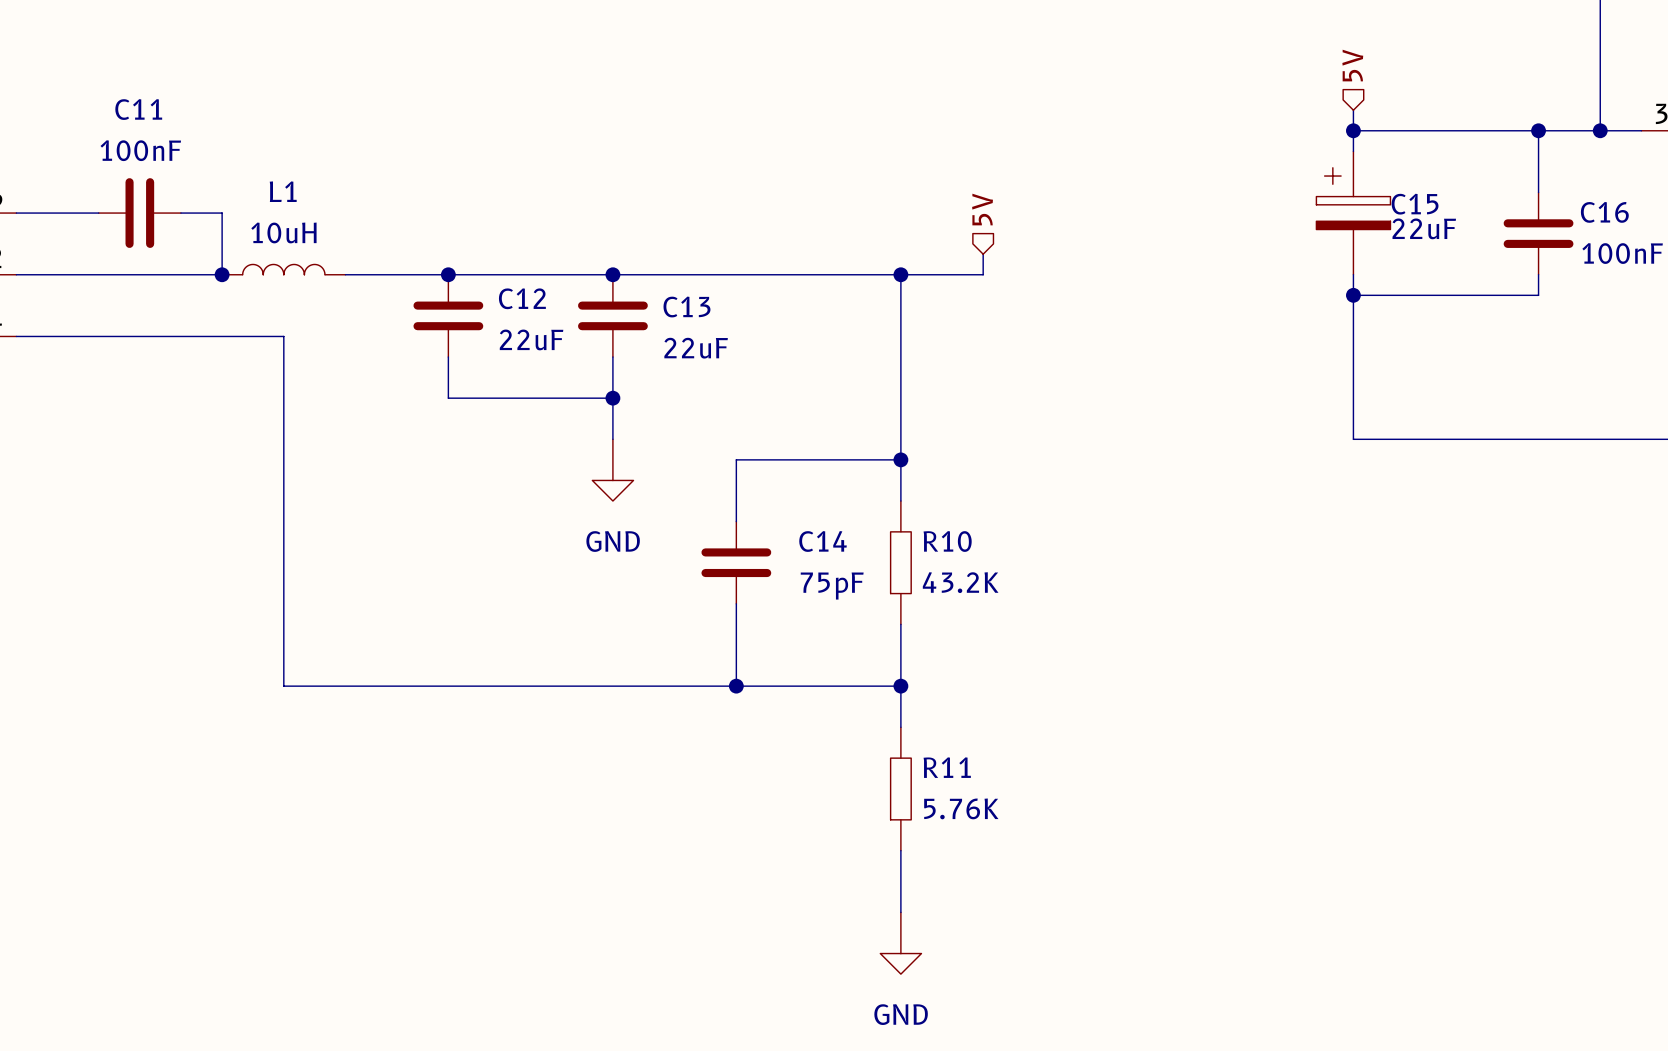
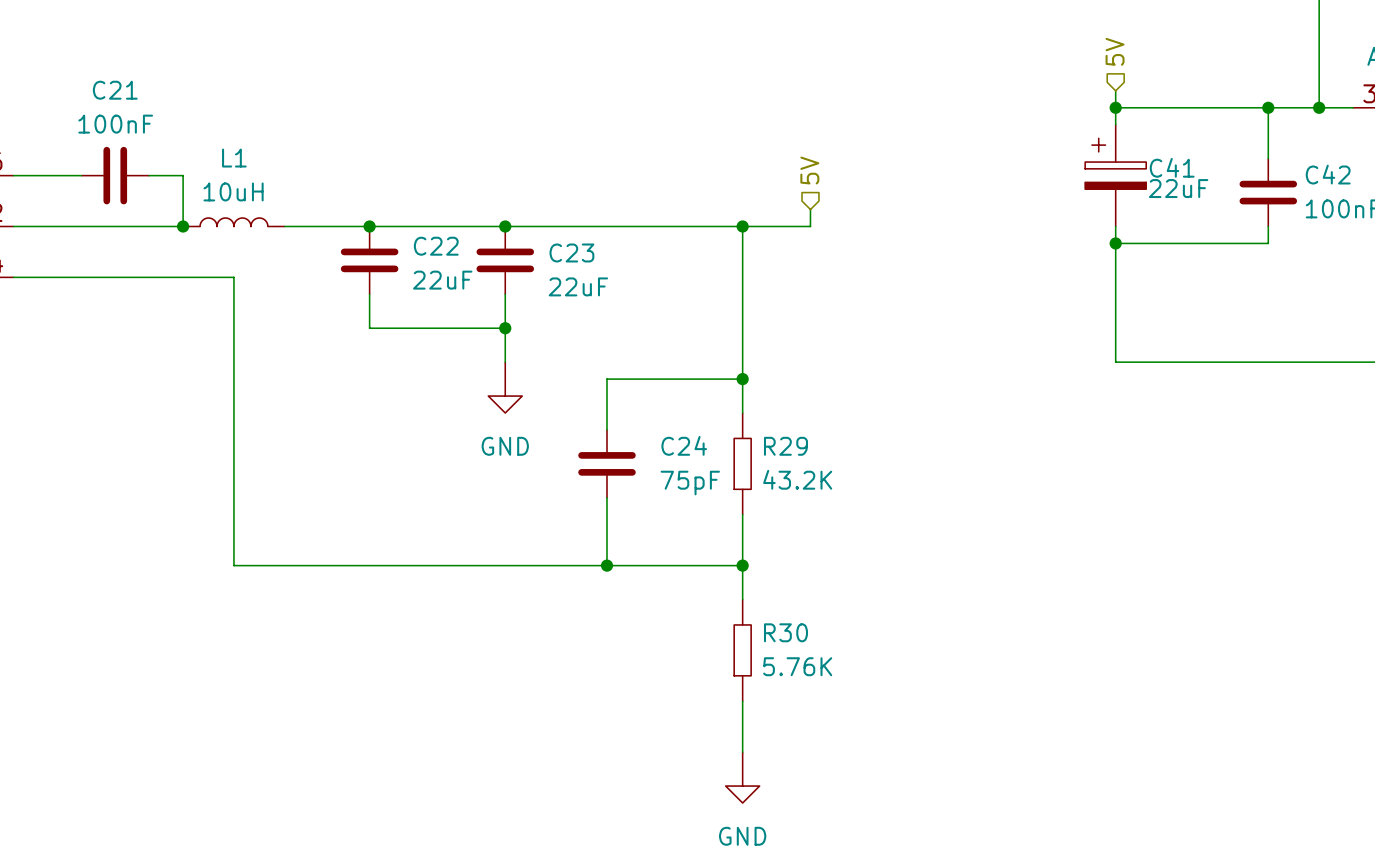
C11 name: C11 (138, 109) -> C21 (115, 90)
C15 name: C15 (1415, 204) -> C41 (1172, 167)
C16 name: C16 (1604, 212) -> C42 (1328, 174)
C12 name: C12 (522, 298) -> C22 (436, 246)
C13 name: C13 (686, 307) -> C23 (571, 252)
C14 name: C14 (823, 541) -> C24 (684, 445)
R10 name: R10 (947, 541) -> R29 (785, 446)
R11 name: R11 (947, 767) -> R30 (785, 632)

